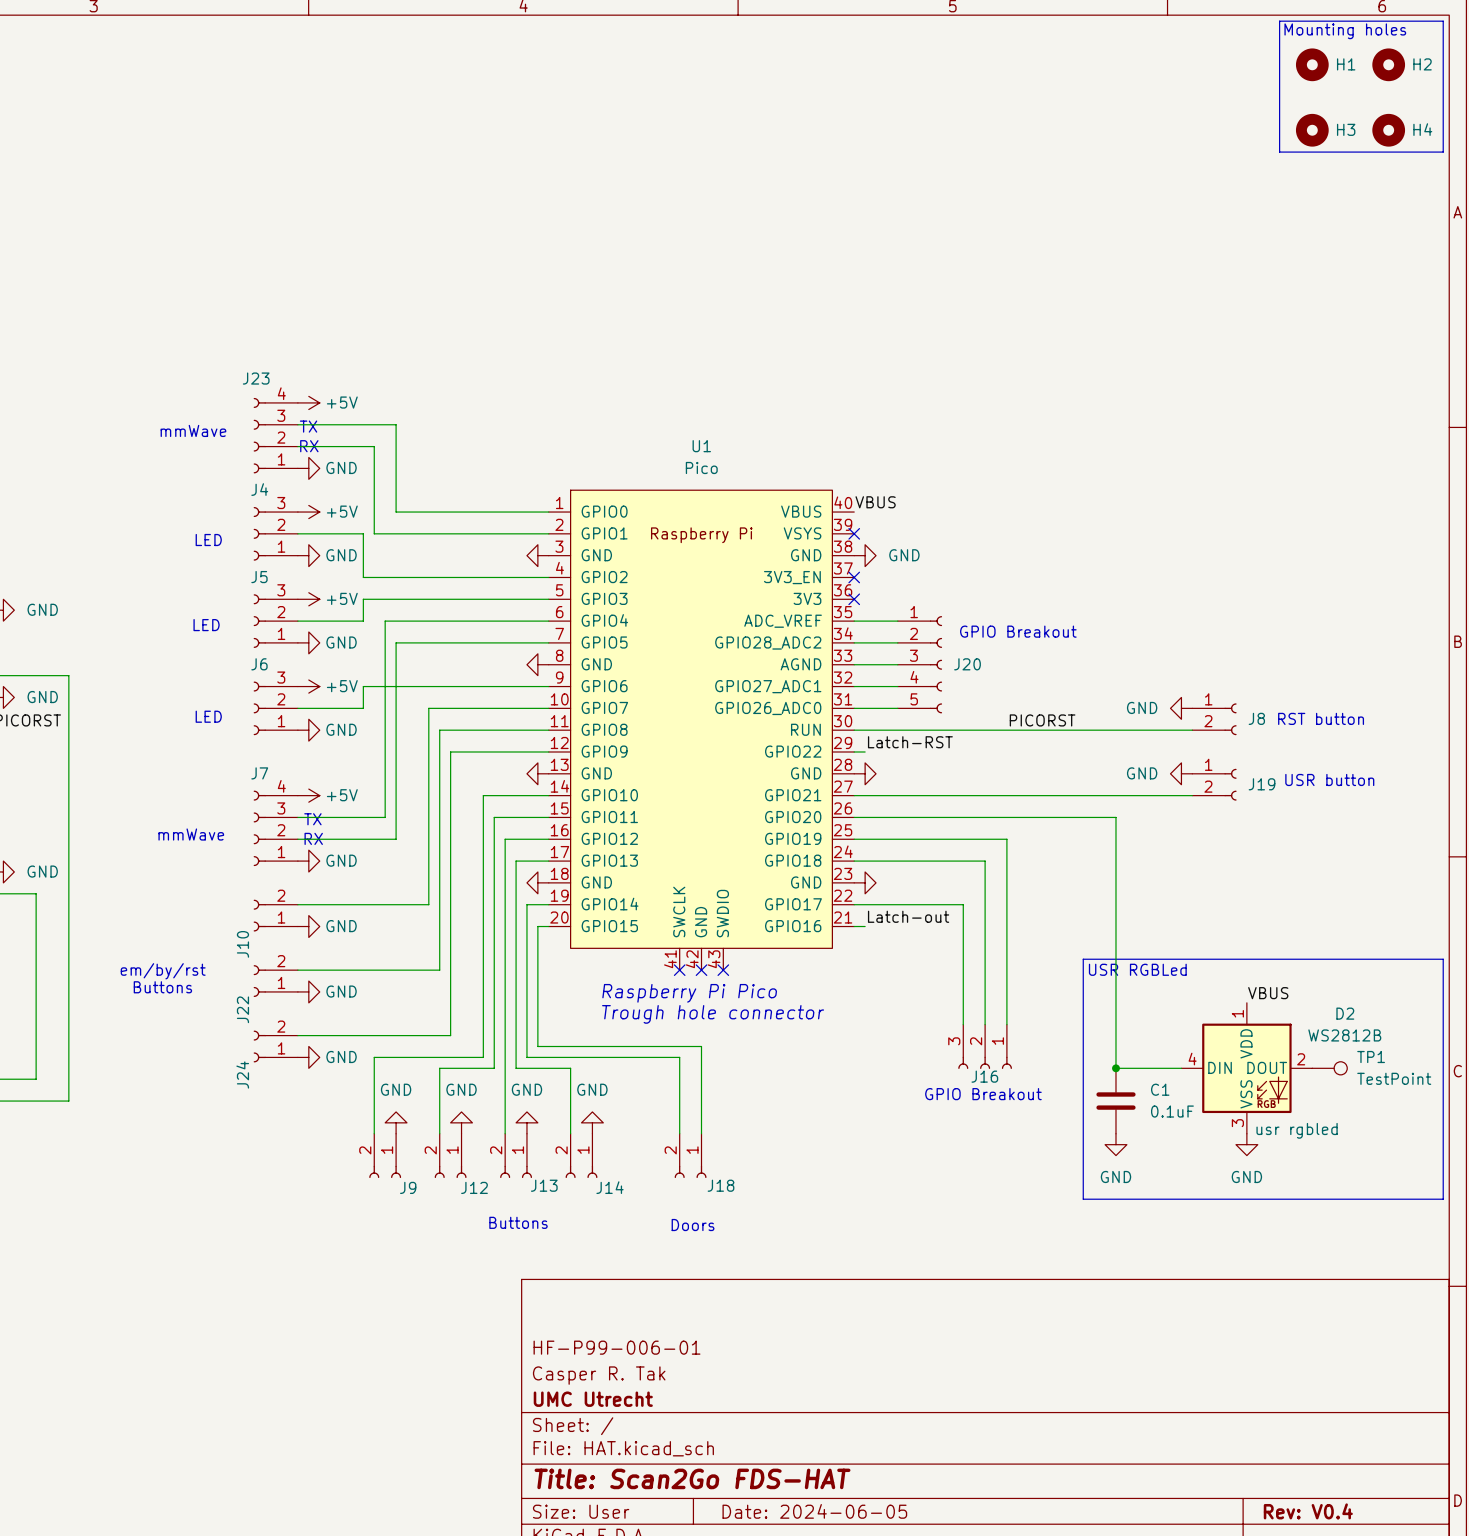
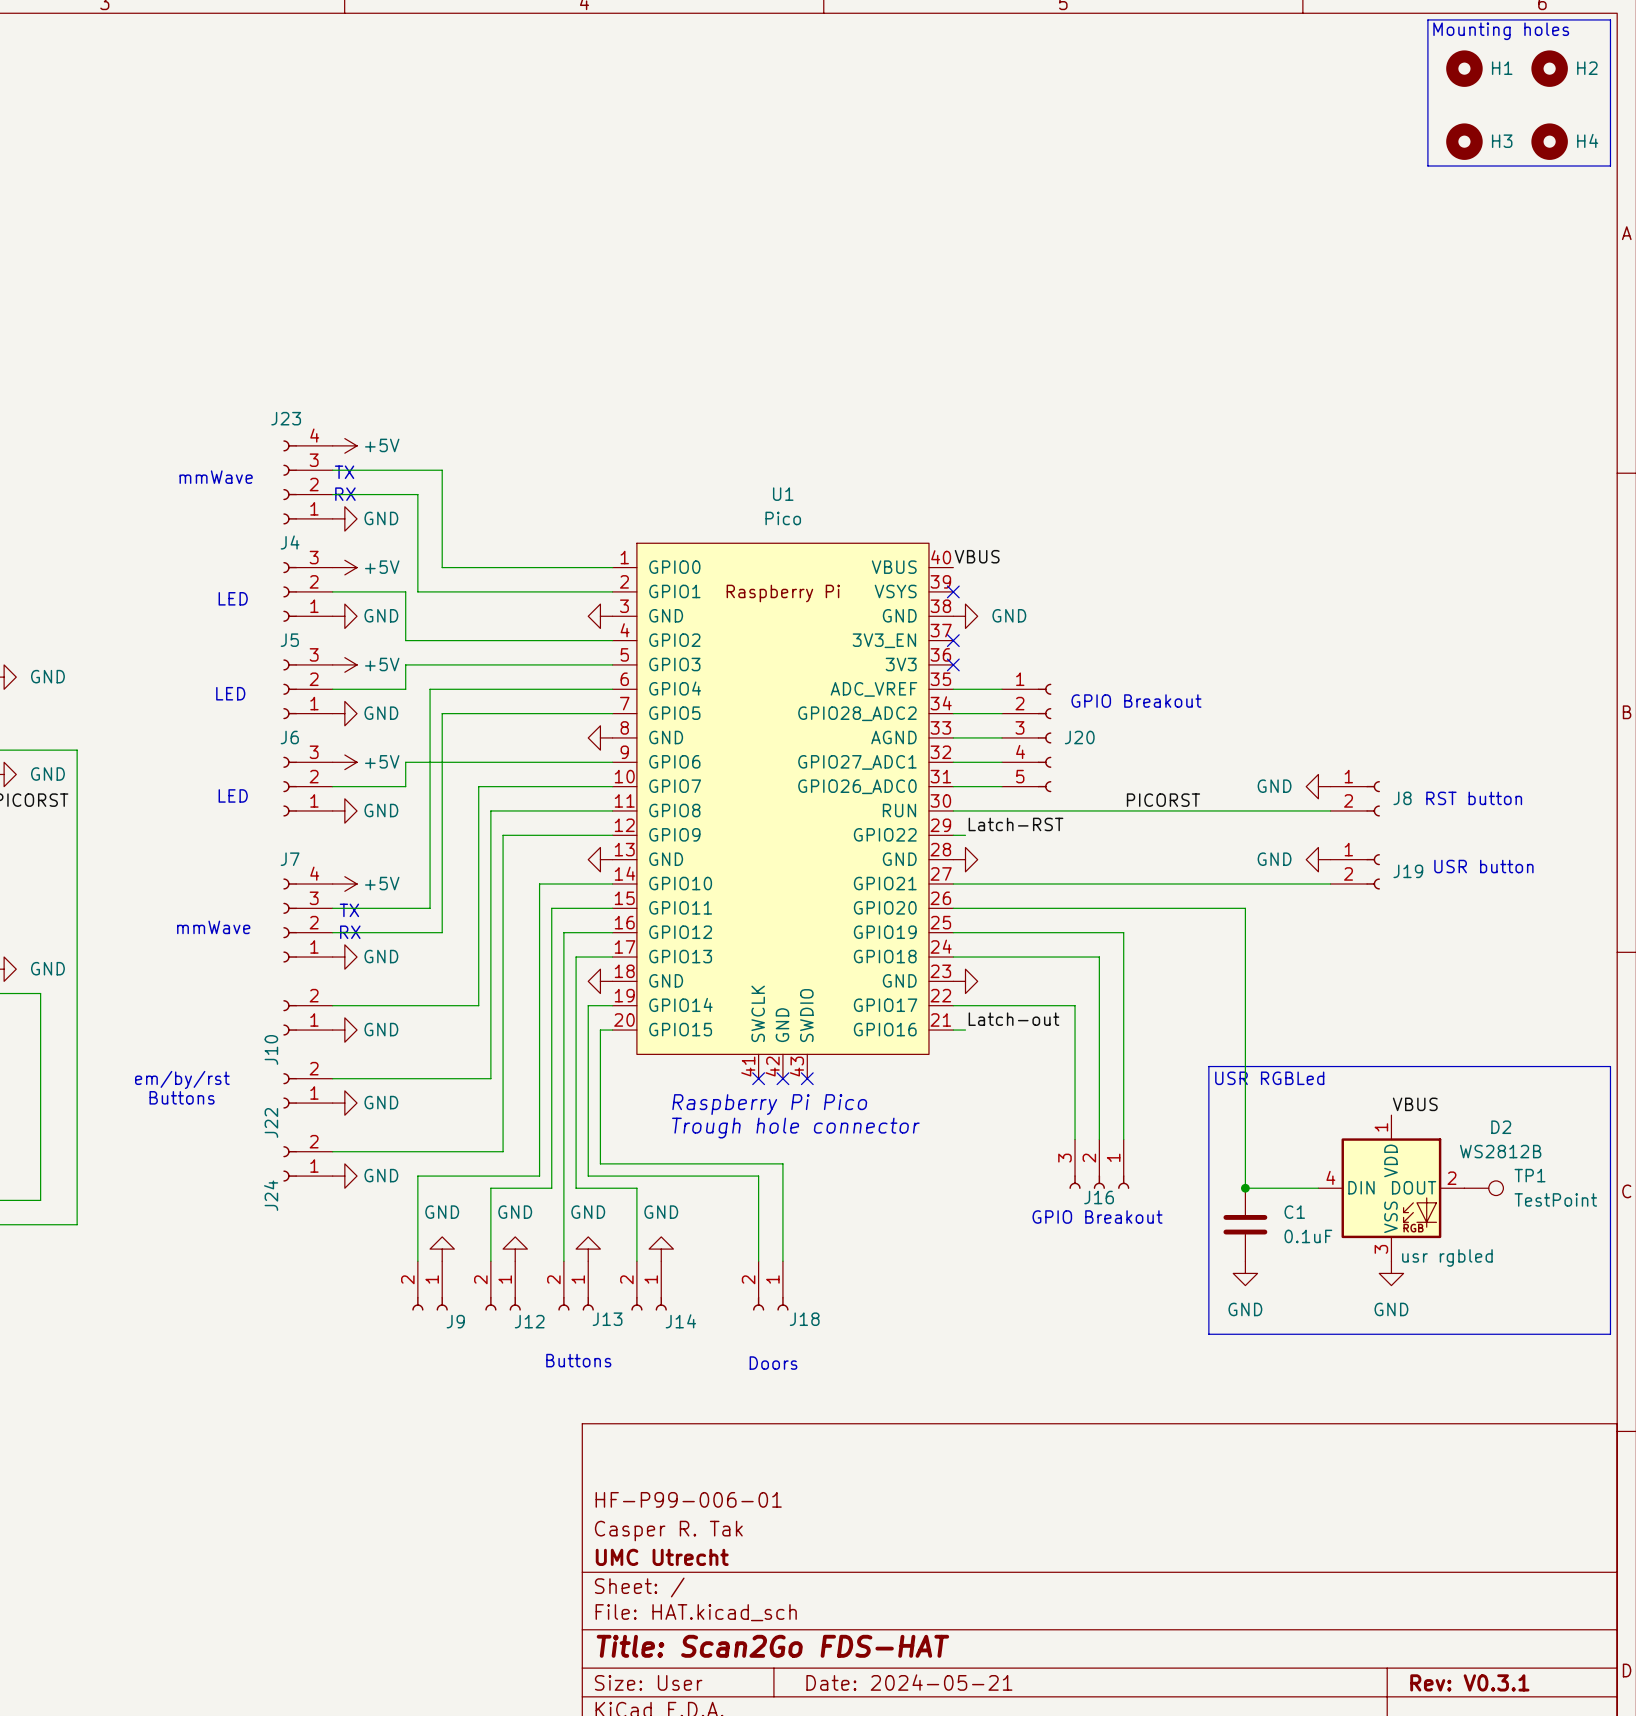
title block: Date: 2024-06-05 (814, 1511) -> Date: 2024-05-21 (909, 1682)
title block: Rev: V0.4 (1308, 1511) -> Rev: V0.3.1 (1469, 1682)

